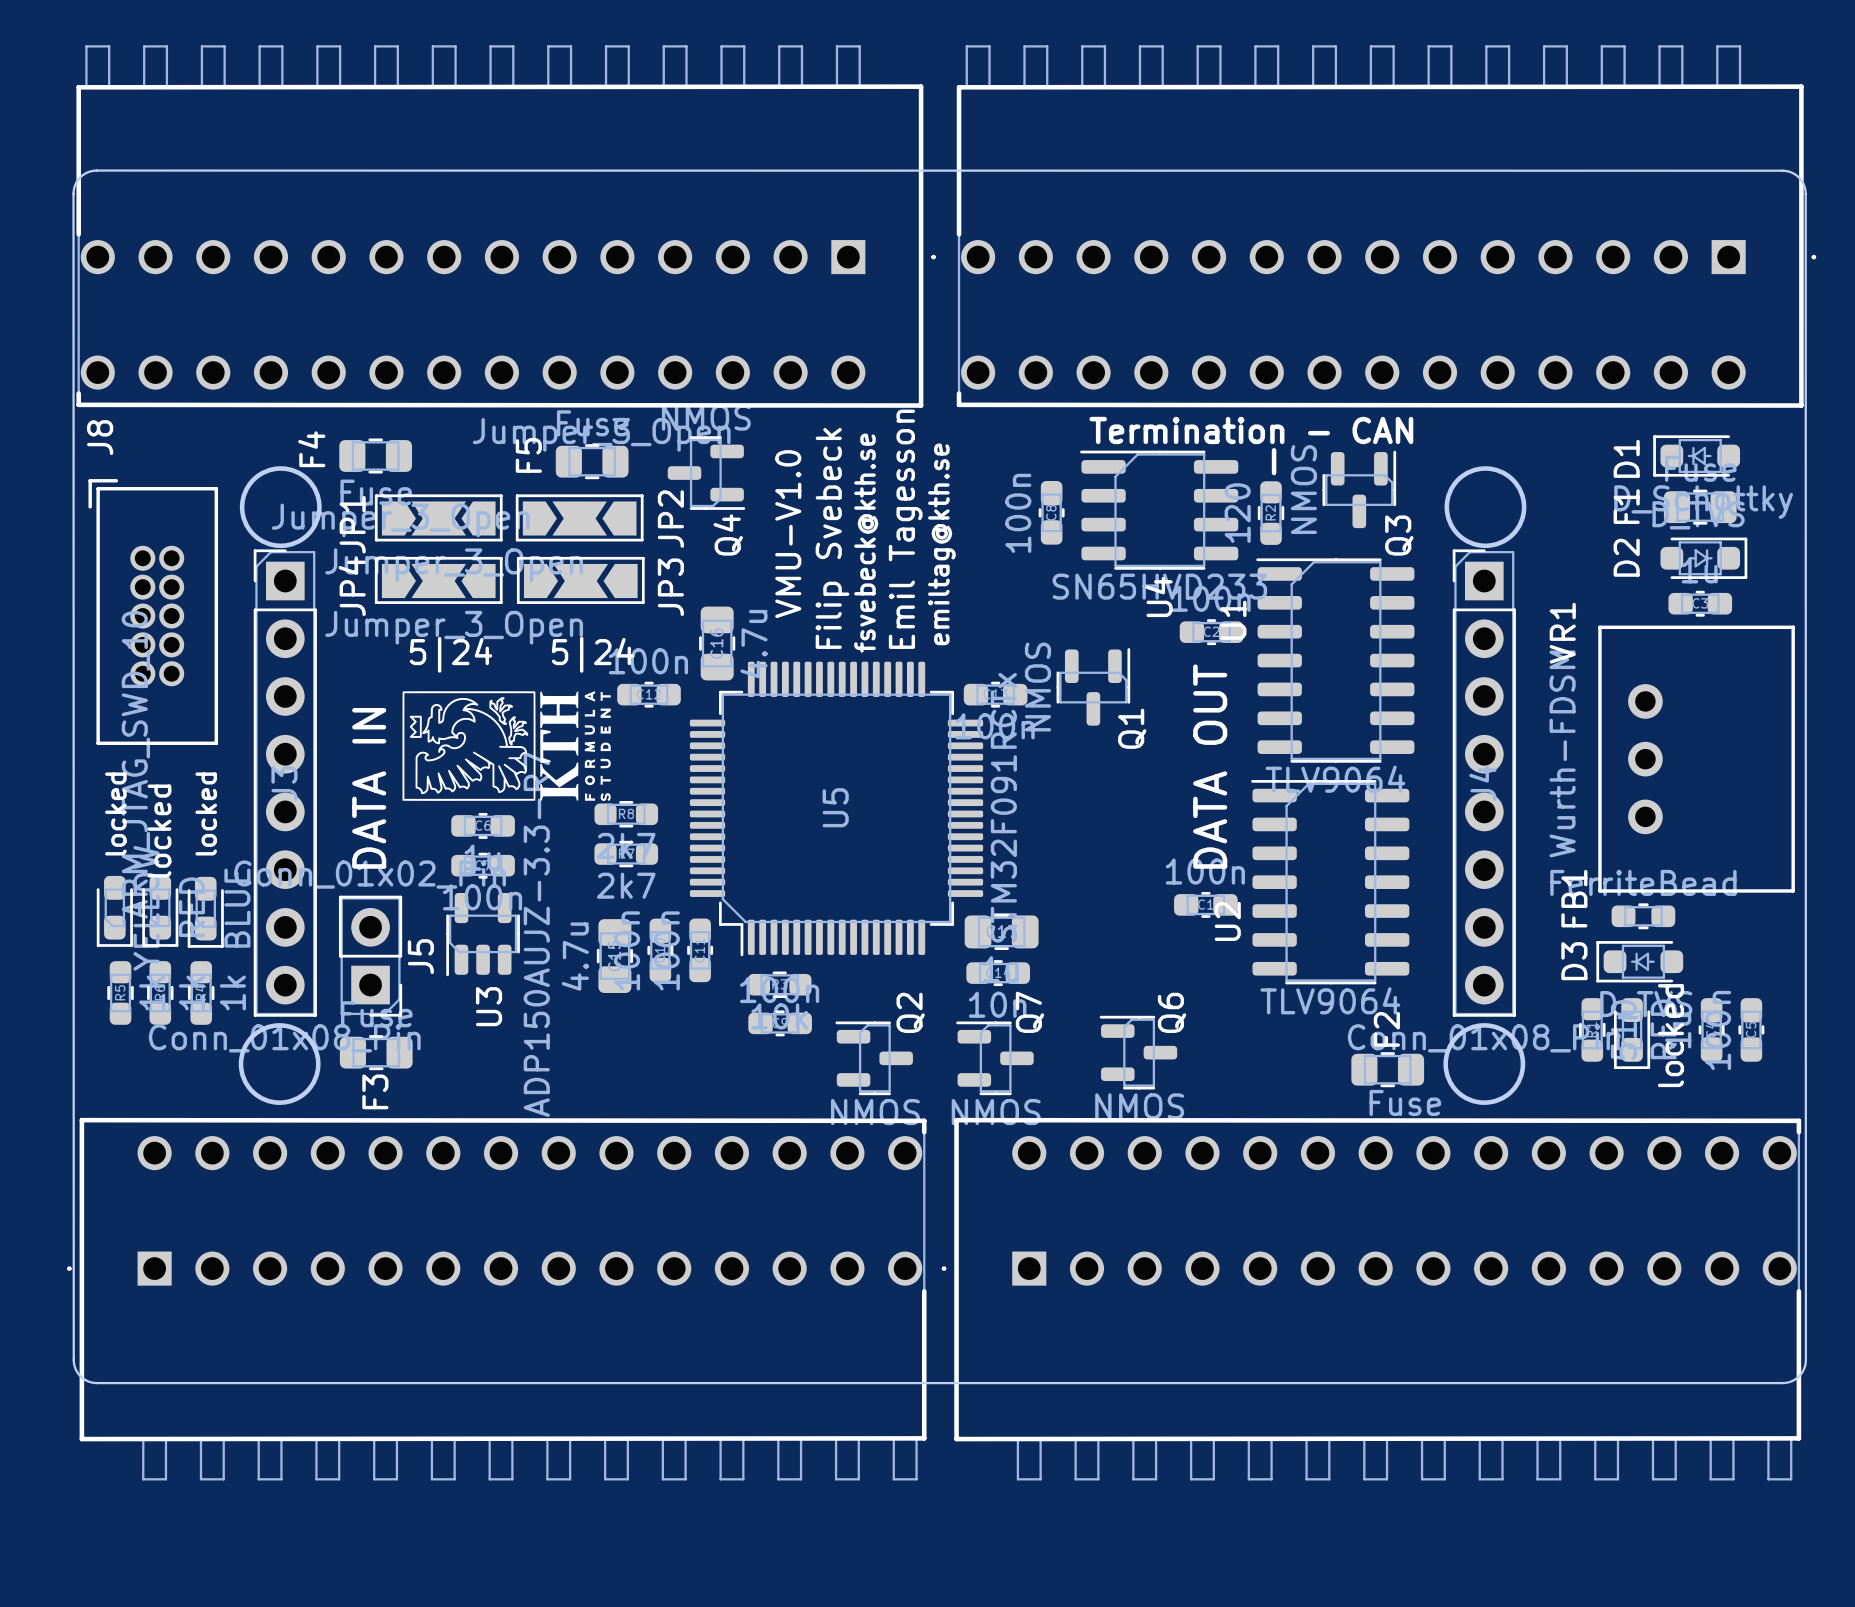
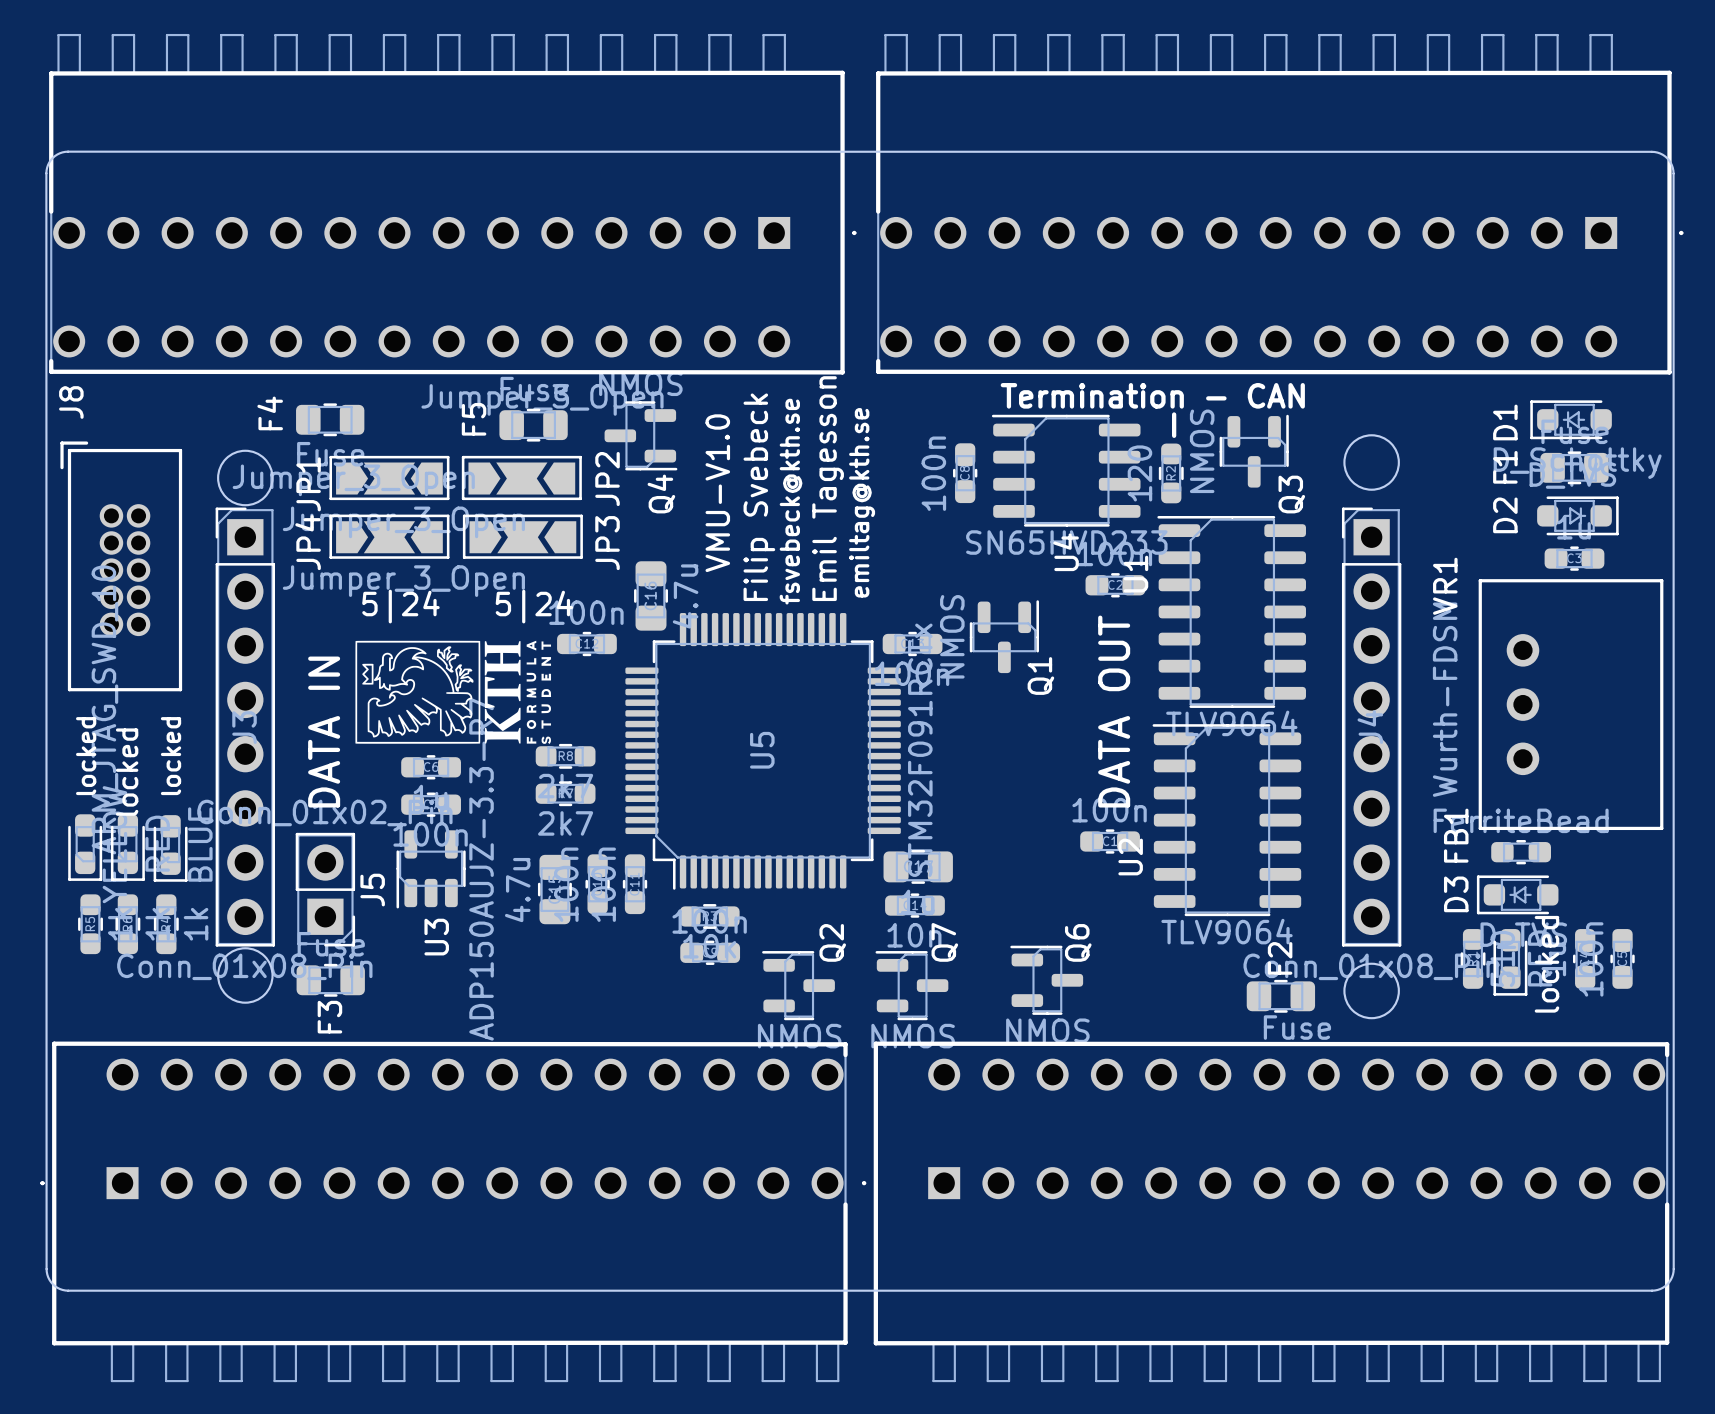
round board edge size: [239, 466, 322, 549] -> [217, 449, 274, 507]
round board edge size: [1444, 466, 1527, 549] -> [1343, 434, 1400, 491]
round board edge size: [238, 1023, 321, 1105] -> [217, 947, 274, 1004]
round board edge size: [1443, 1023, 1526, 1105] -> [1343, 962, 1400, 1020]

